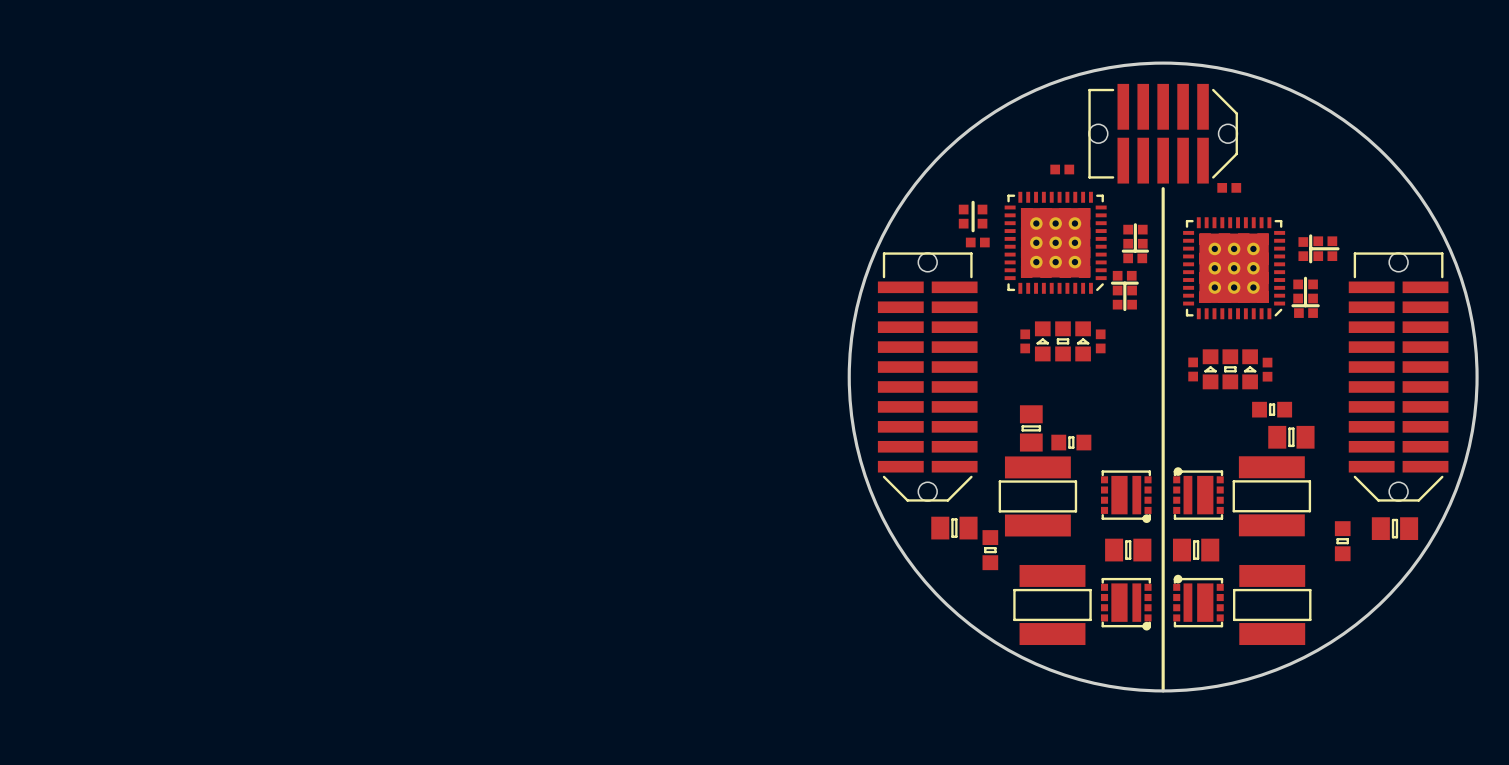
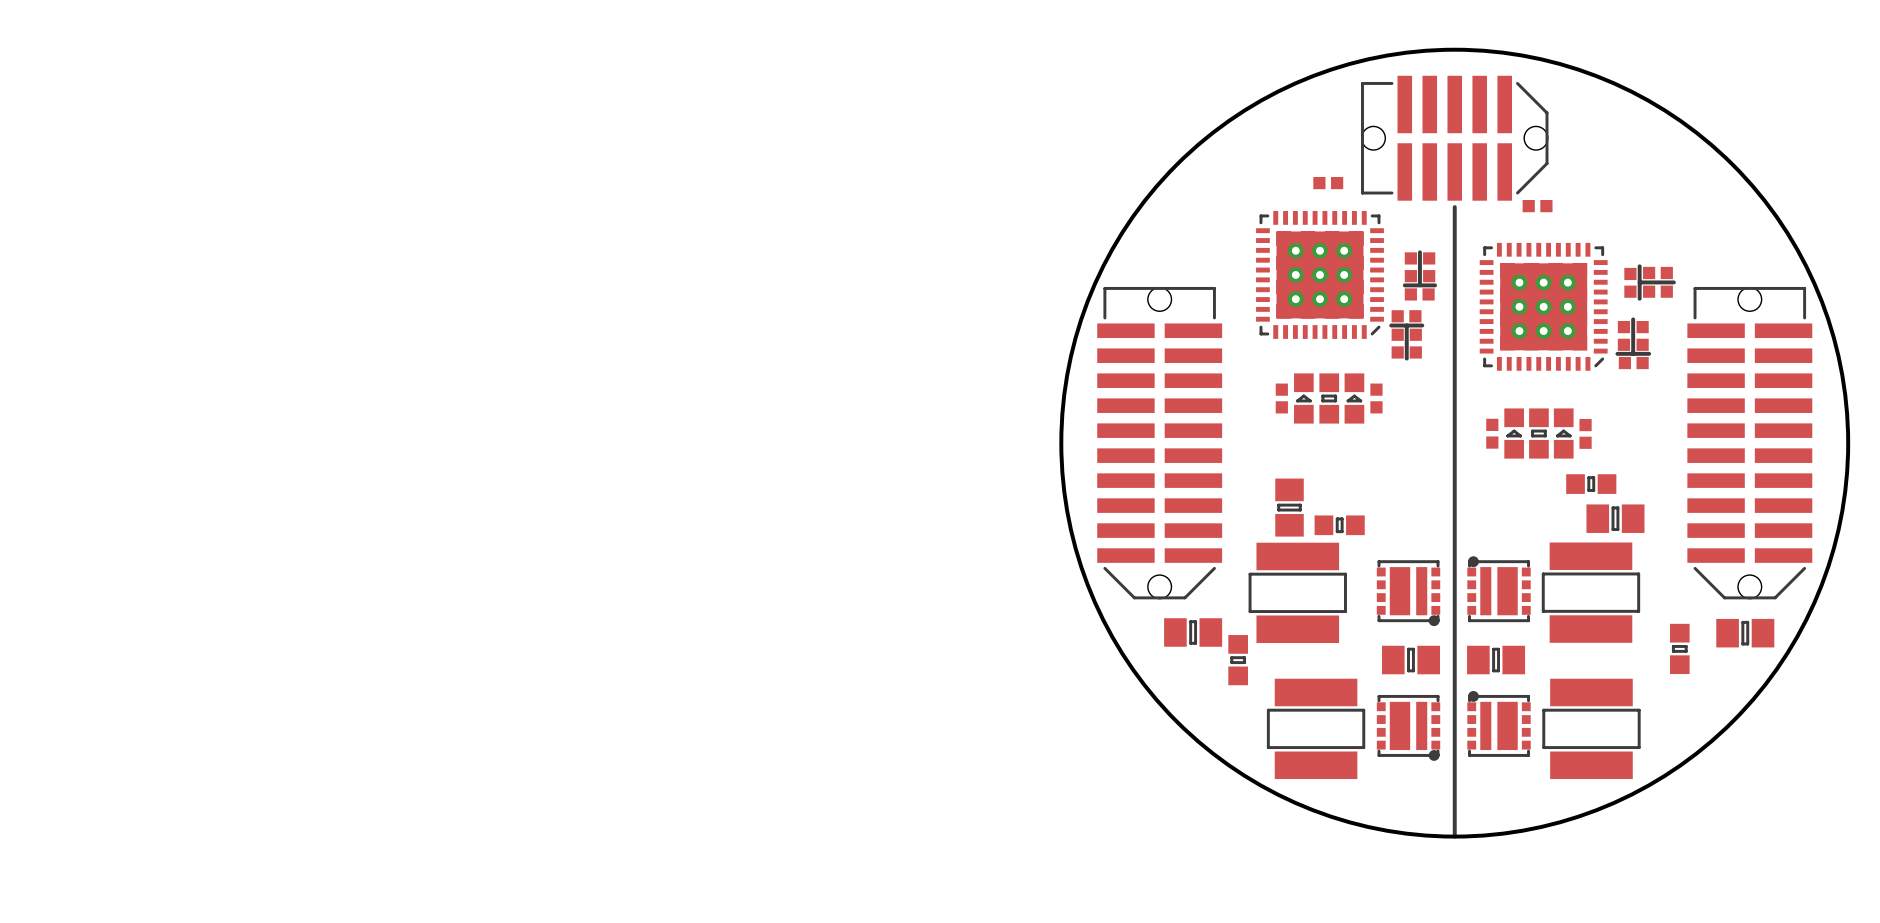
line: (973, 202) (973, 230) -> none
part: (963, 216) -> none
part: (982, 216) -> none
part: (977, 242) -> none

